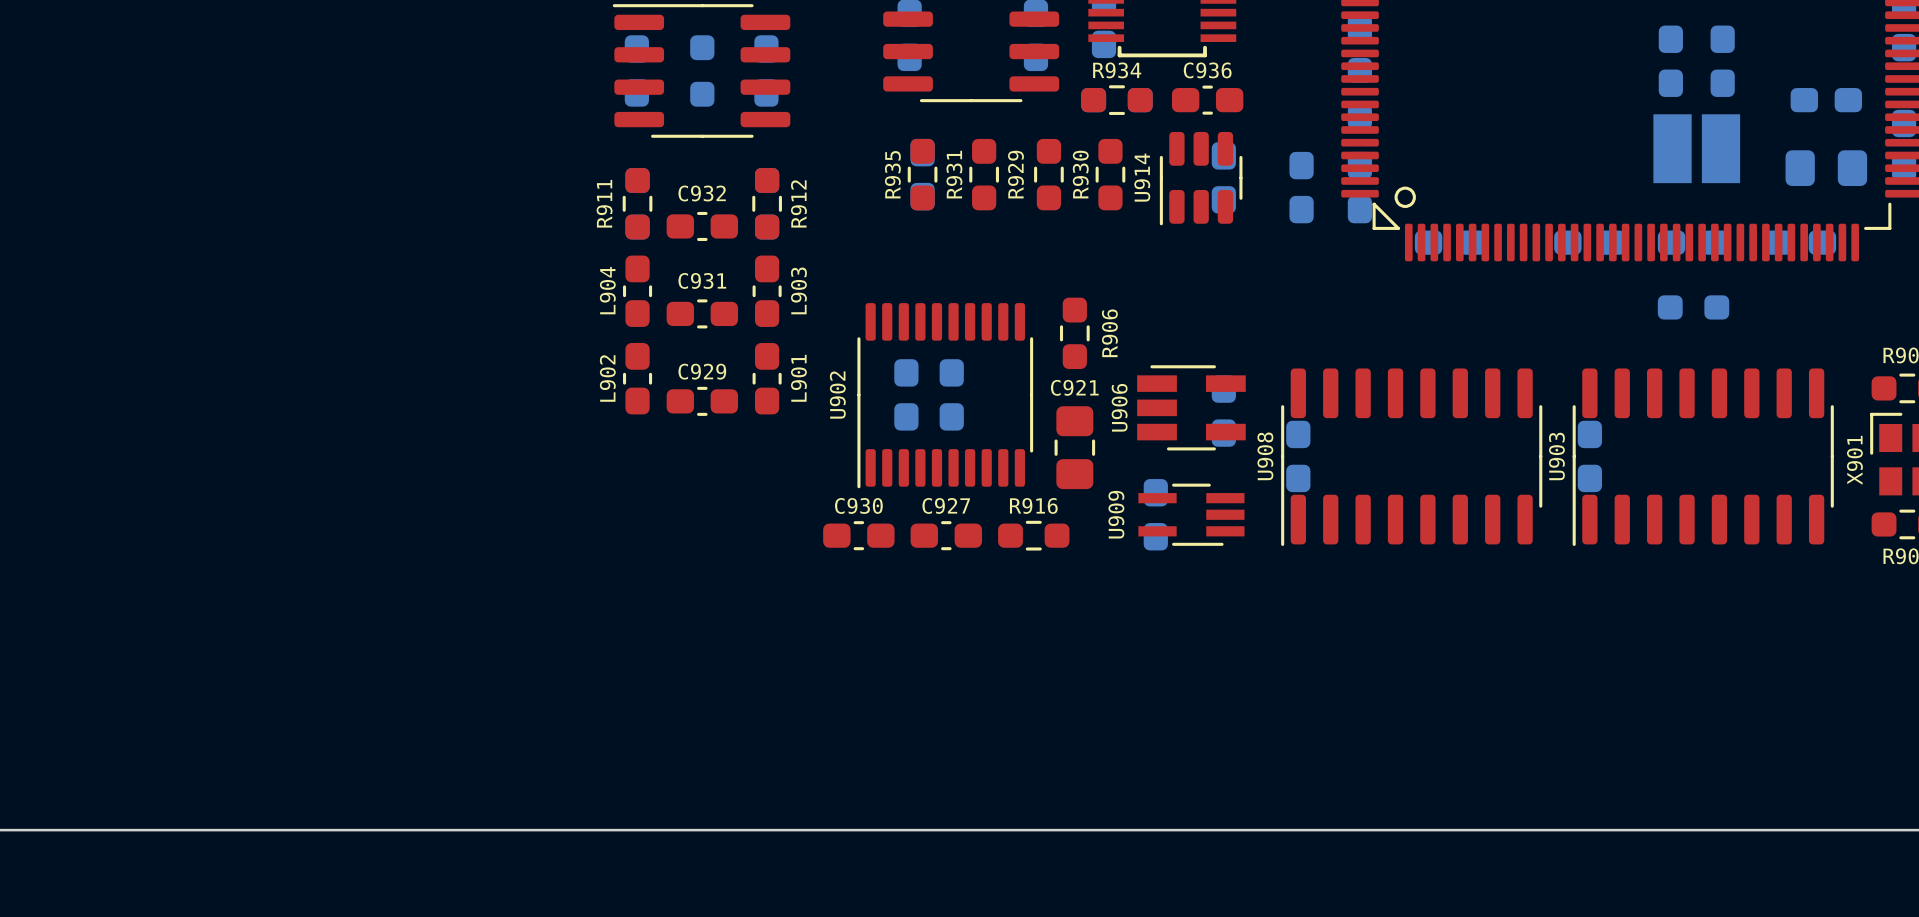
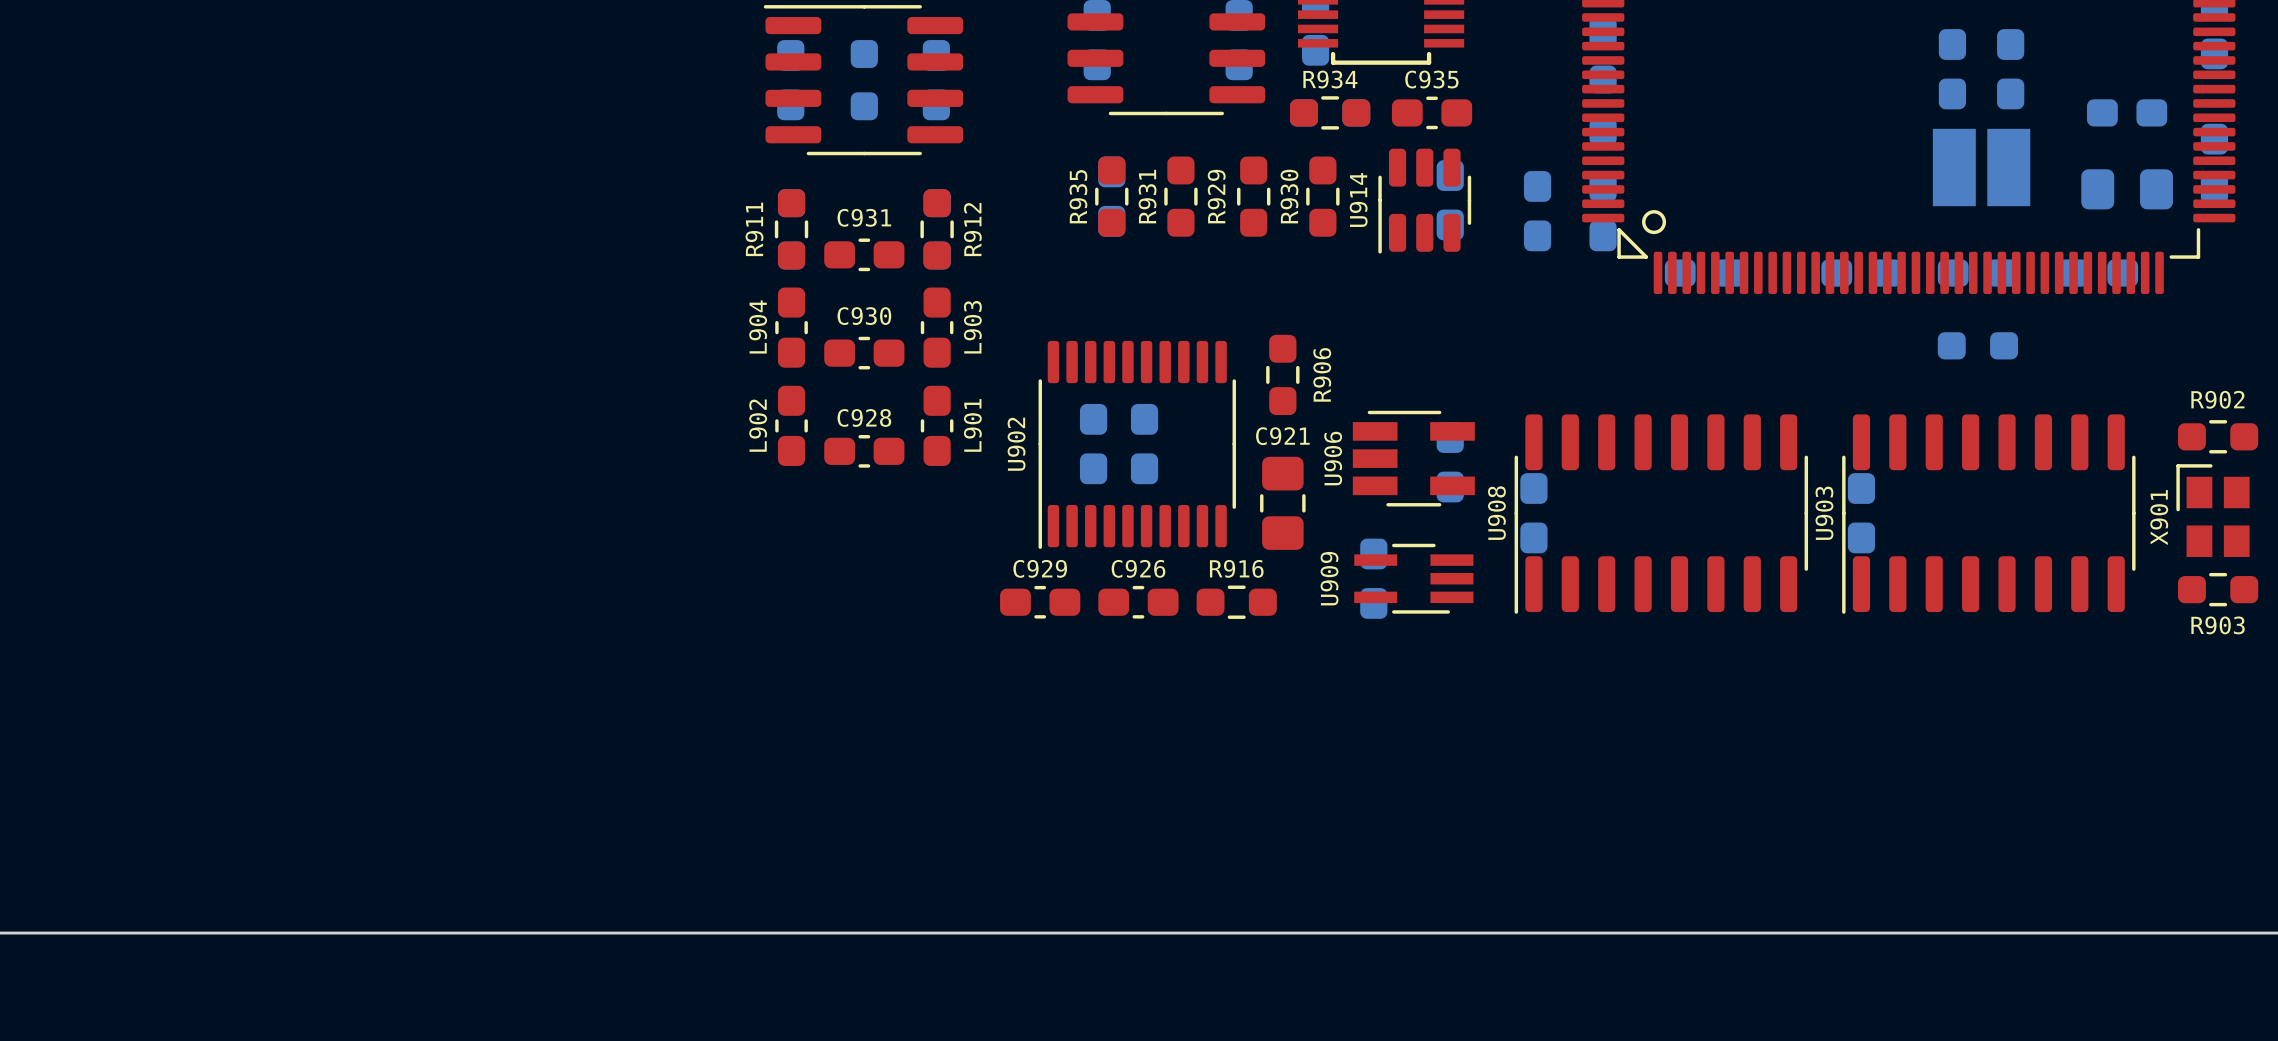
C936 name: C936 (1207, 70) -> C935 (1431, 79)
C932 name: C932 (702, 193) -> C931 (864, 217)
C931 name: C931 (702, 280) -> C930 (864, 316)
C929 name: C929 (702, 371) -> C928 (864, 417)
C930 name: C930 (858, 505) -> C929 (1040, 568)
C927 name: C927 (946, 505) -> C926 (1138, 568)

